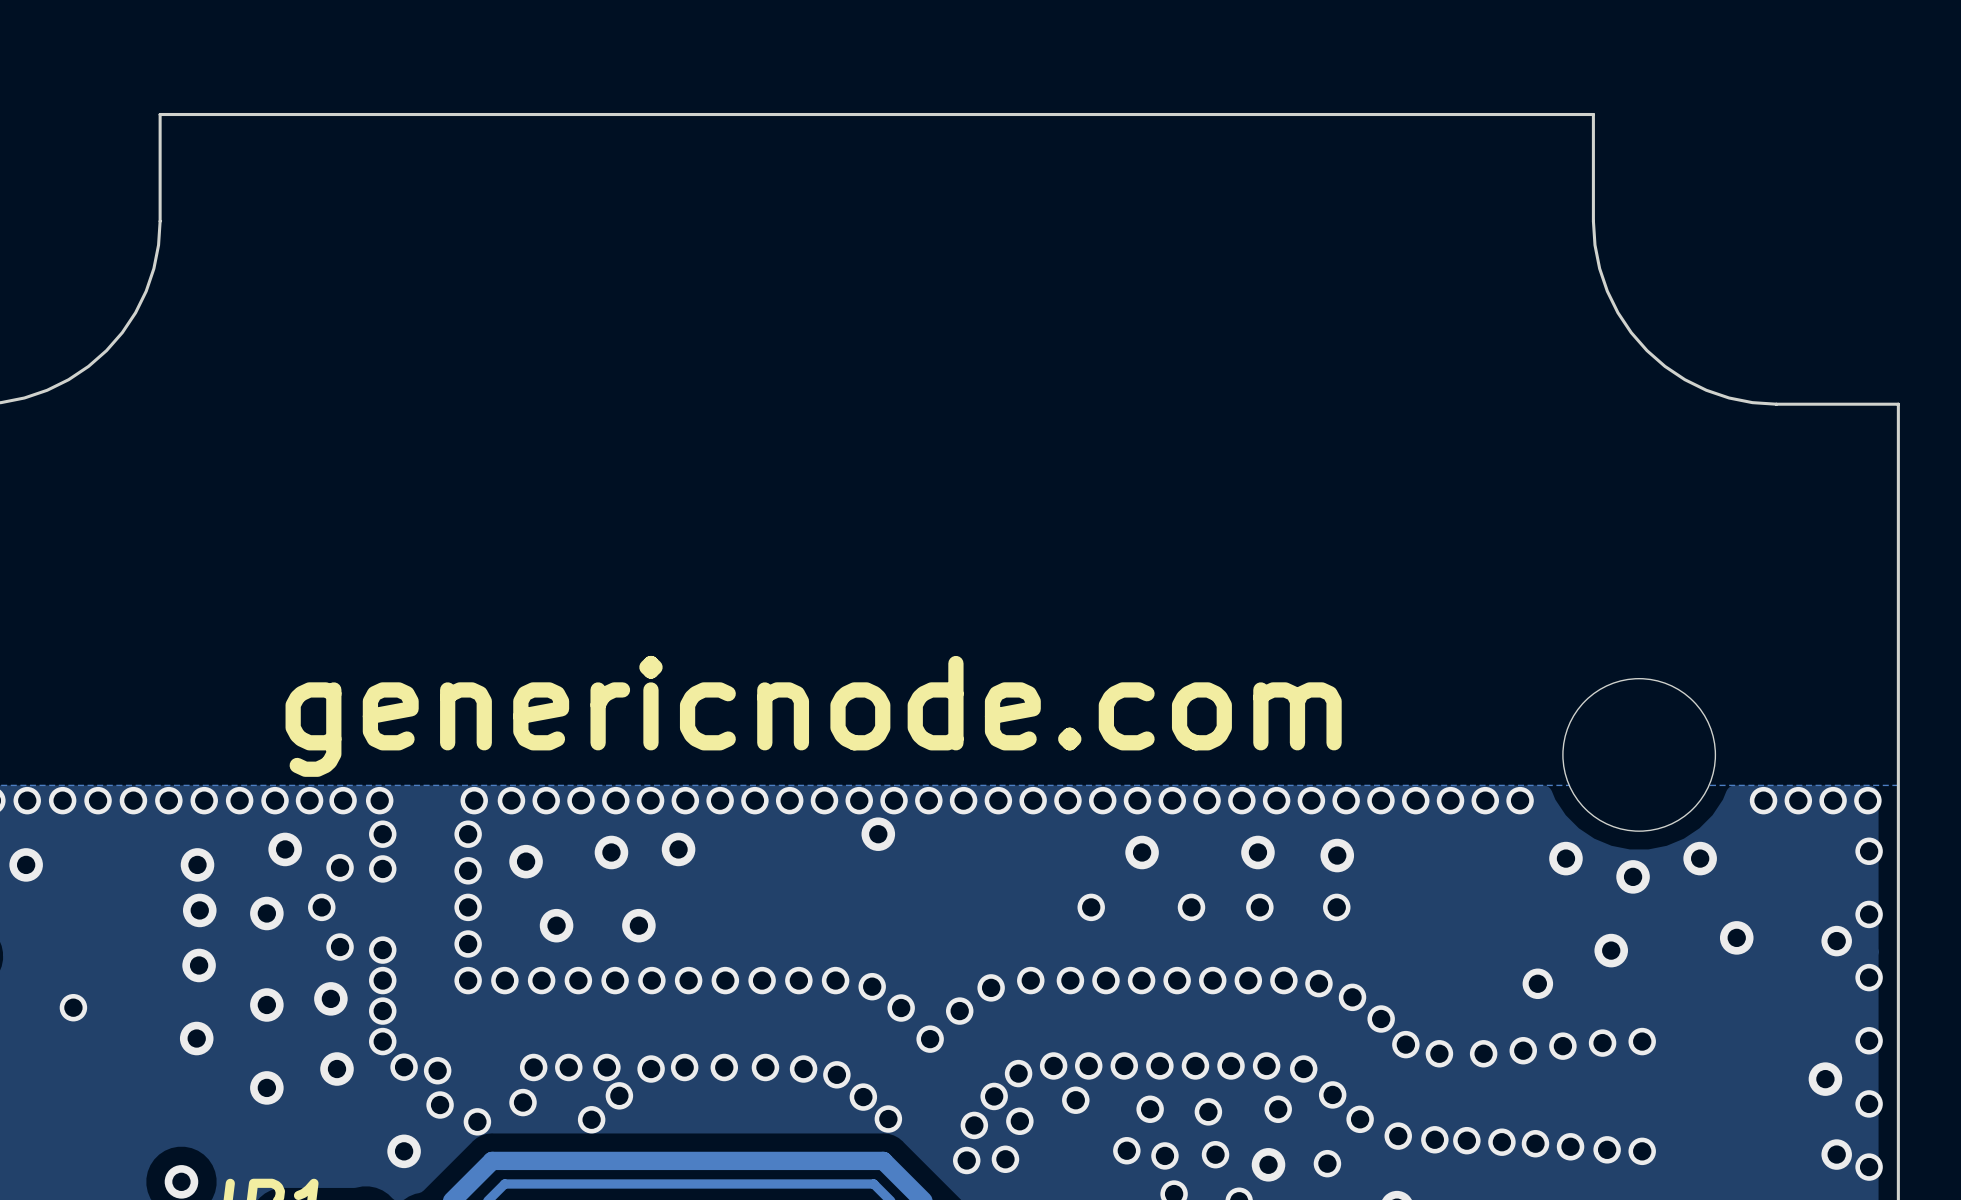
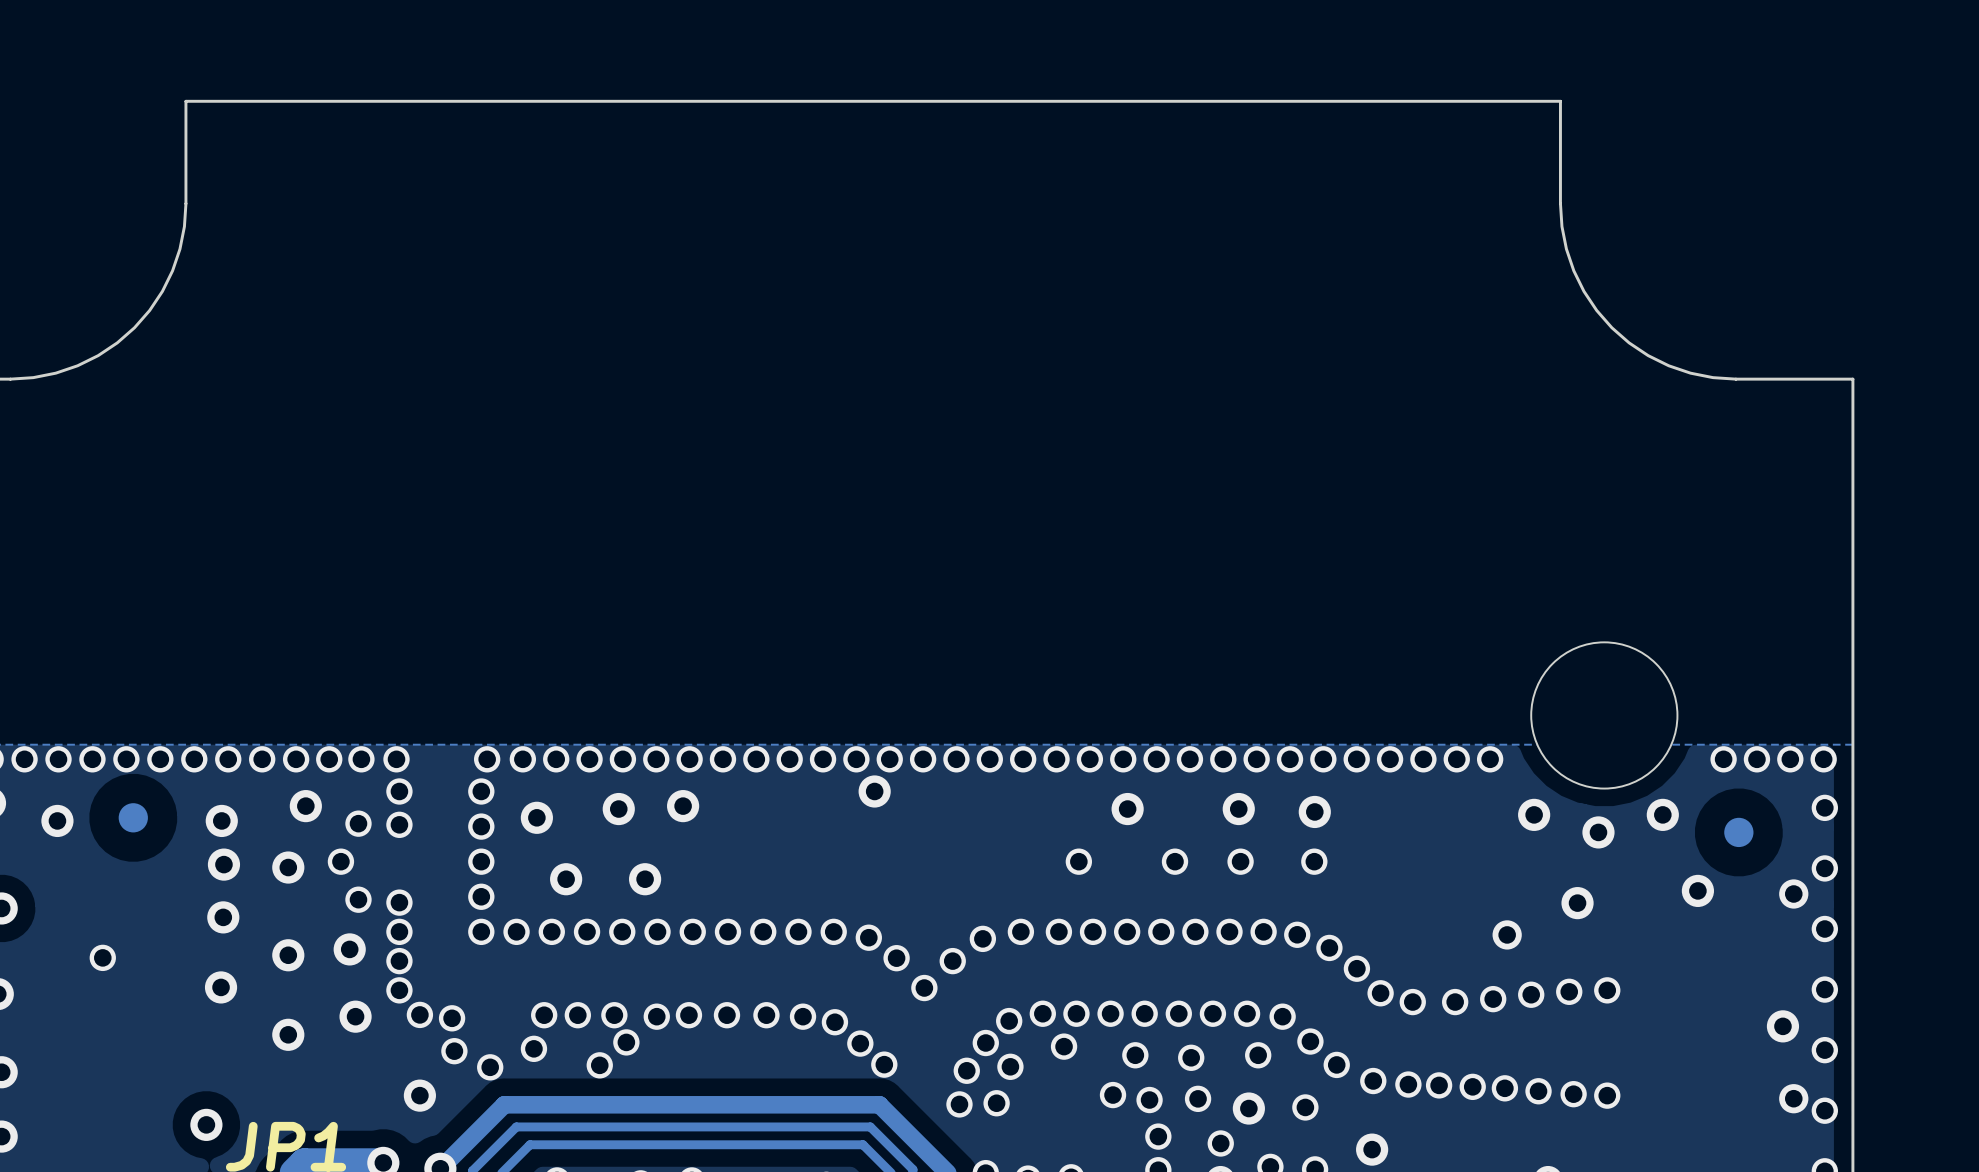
text: genericnode.com (813, 716) -> none
part: none -> (133, 817)
part: none -> (1738, 832)

